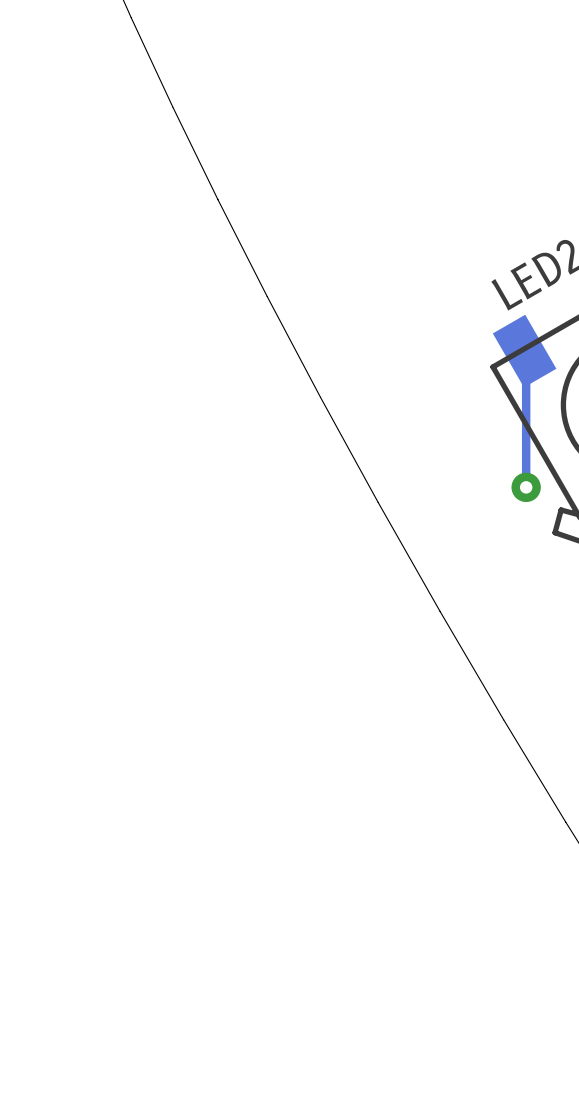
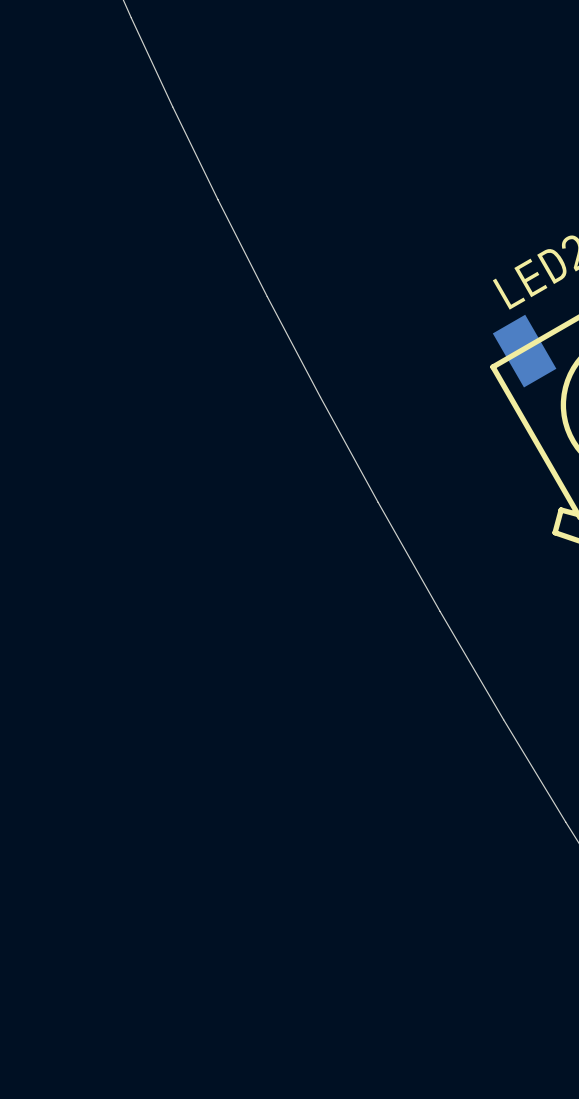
track: (524, 351) (526, 352) (526, 487) -> none
via: (526, 487) -> none

